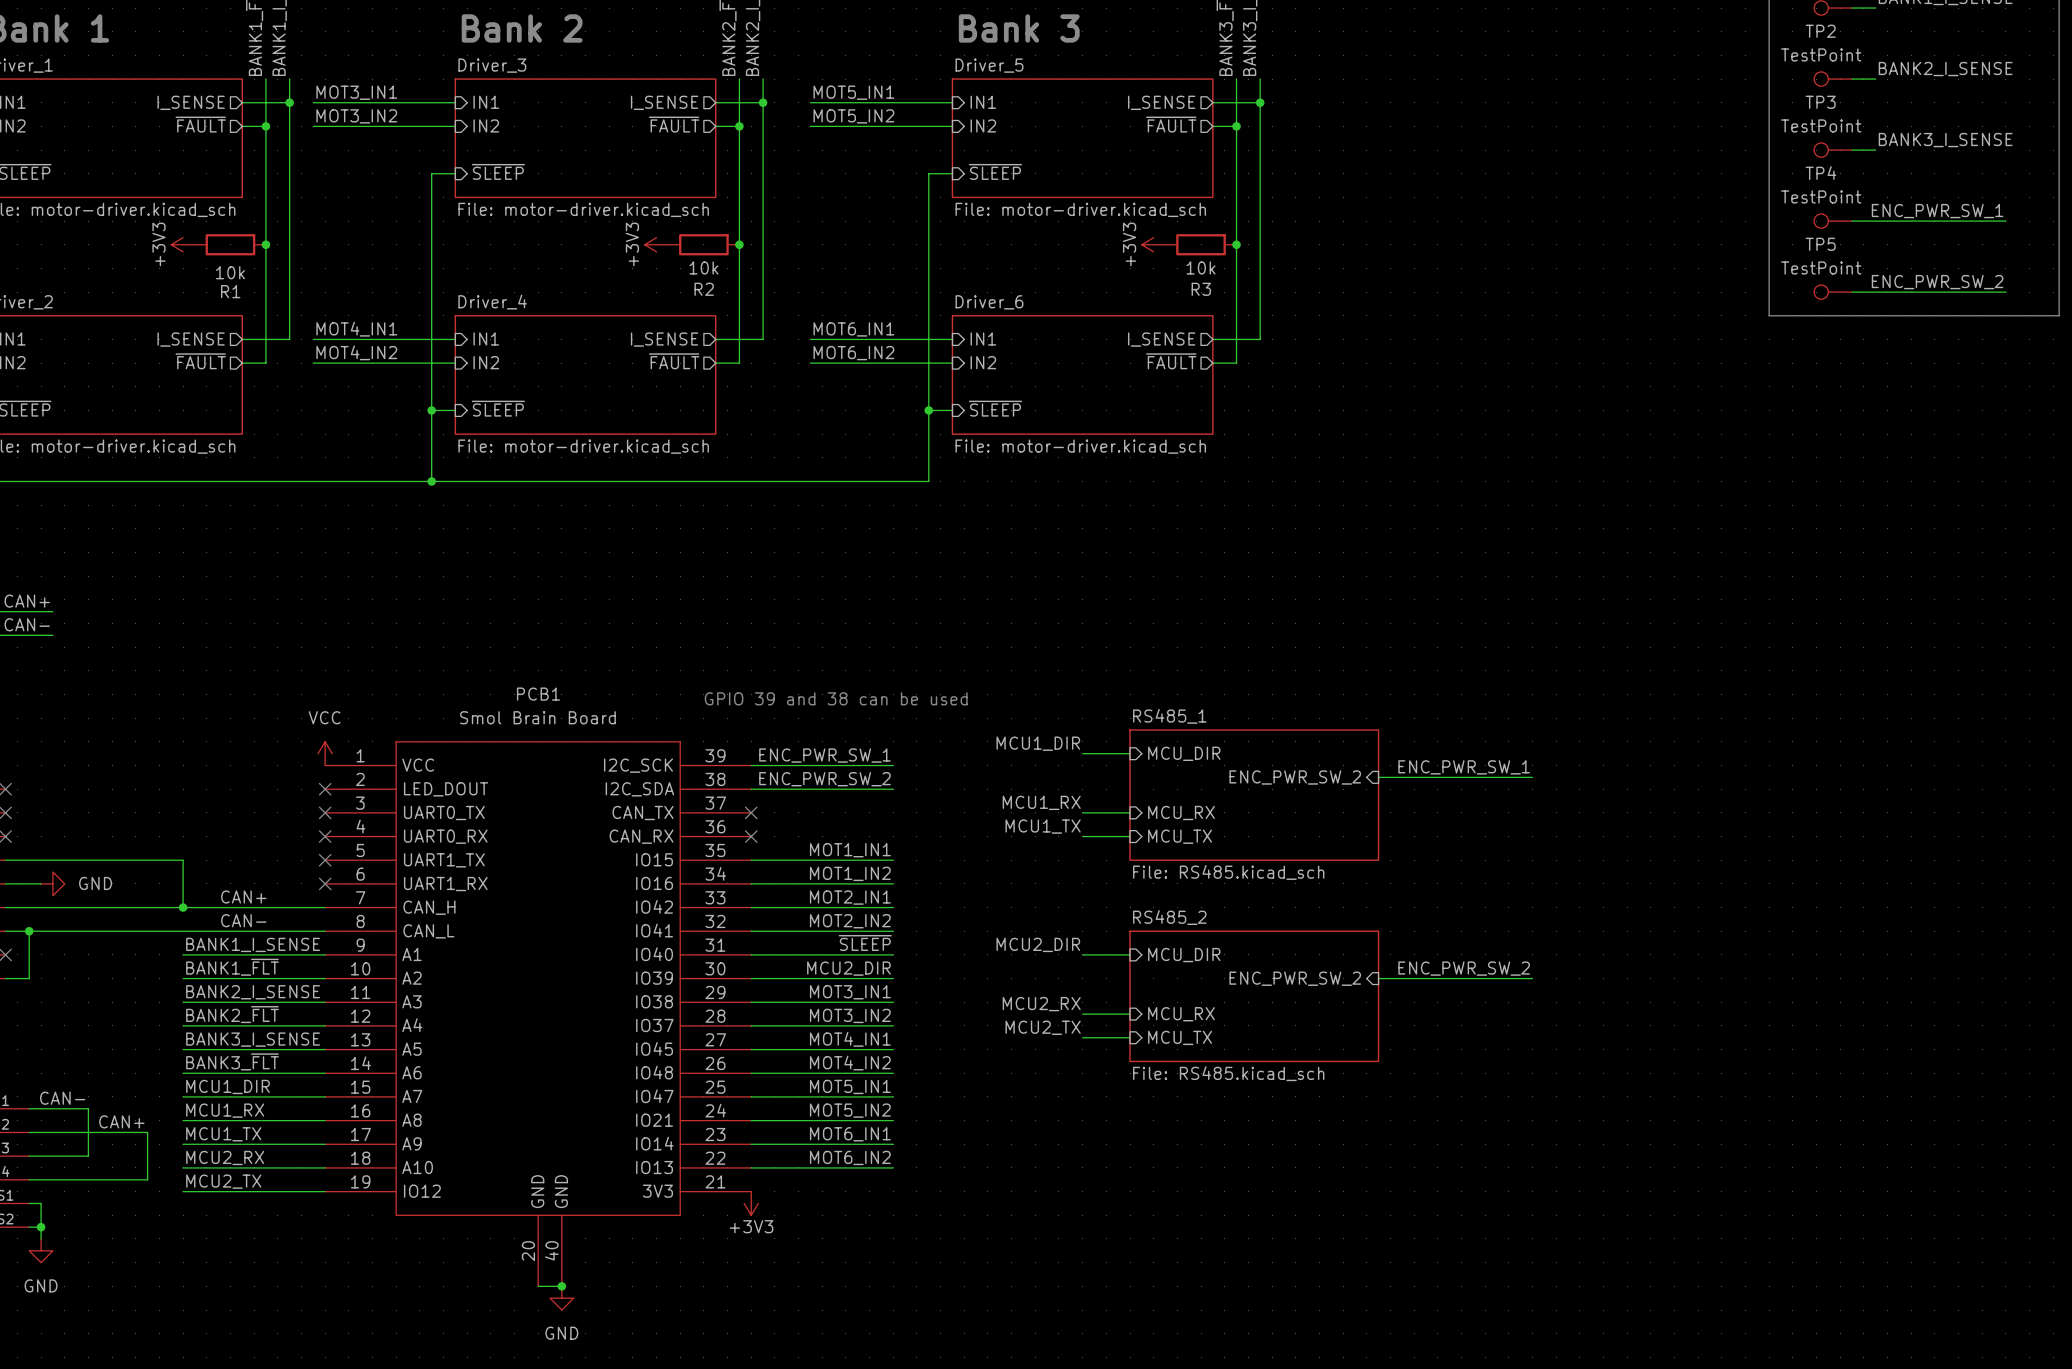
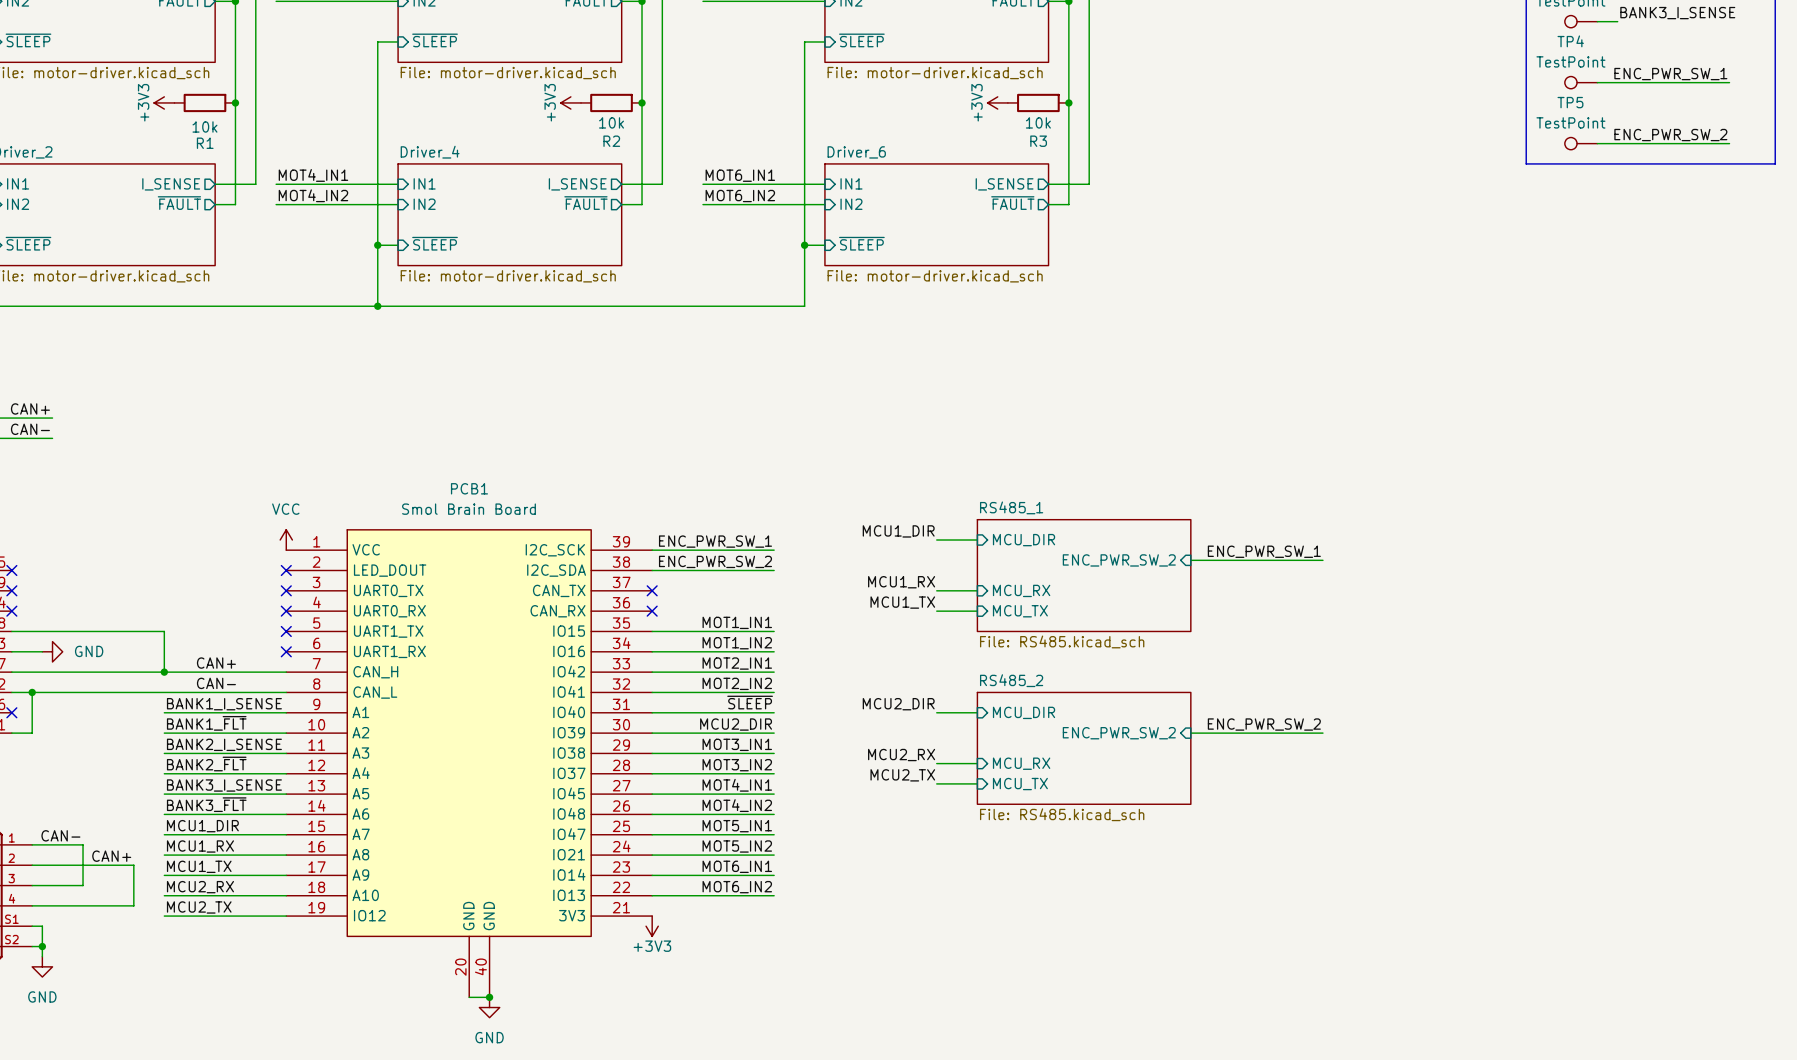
text: GPIO 39 and 38 can be used (836, 698) -> none

